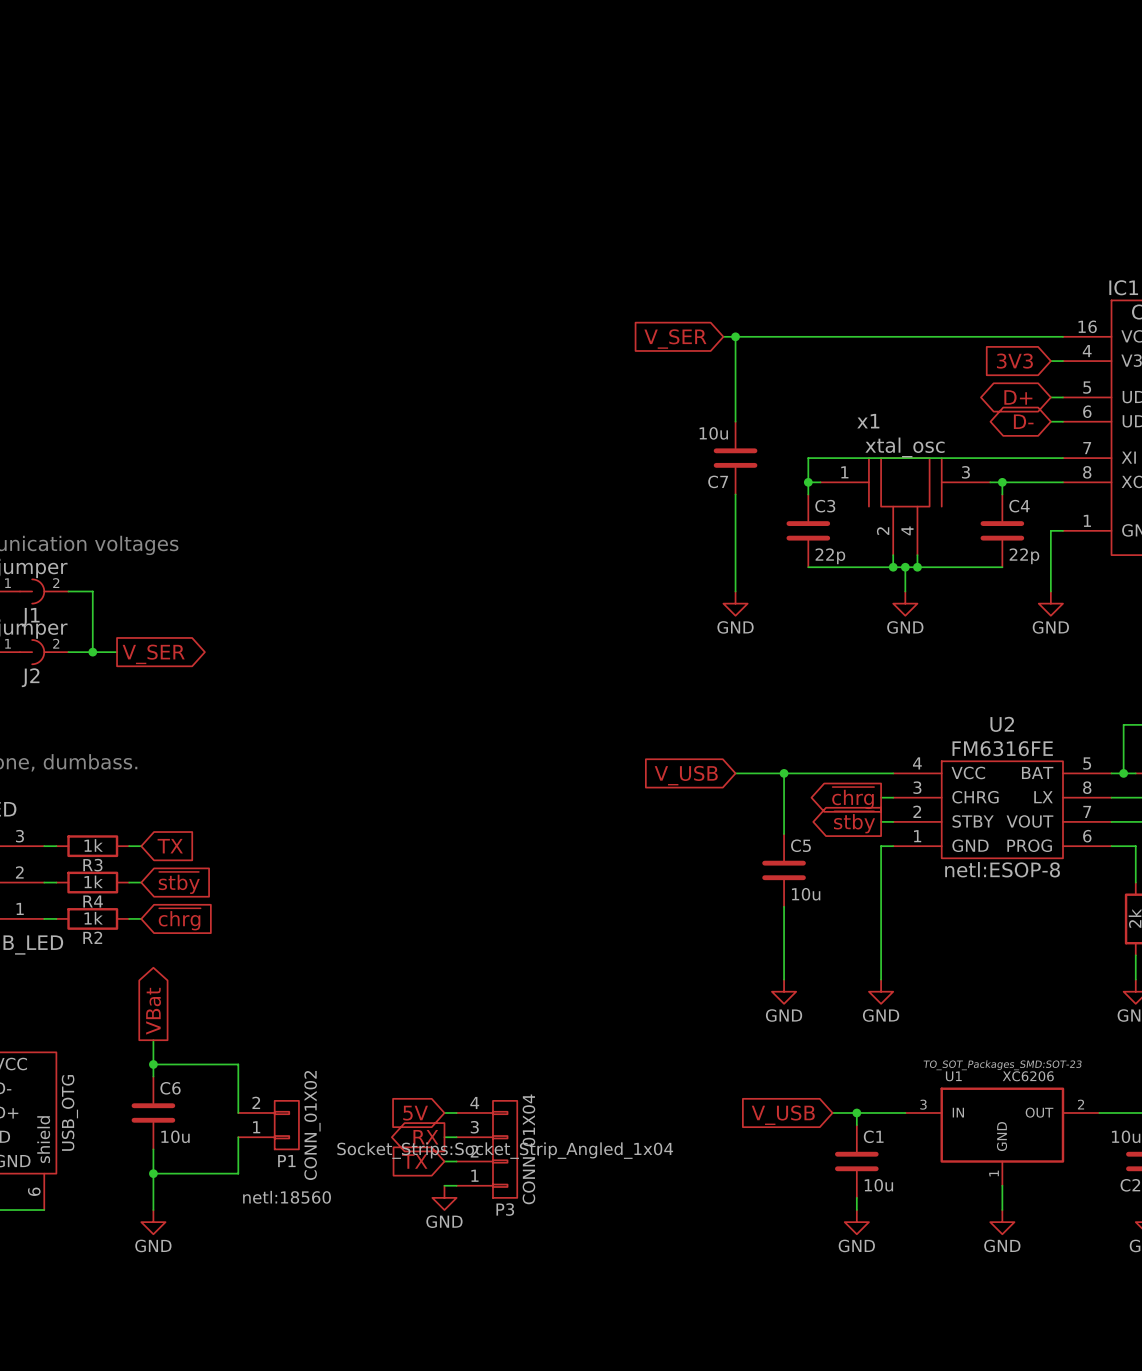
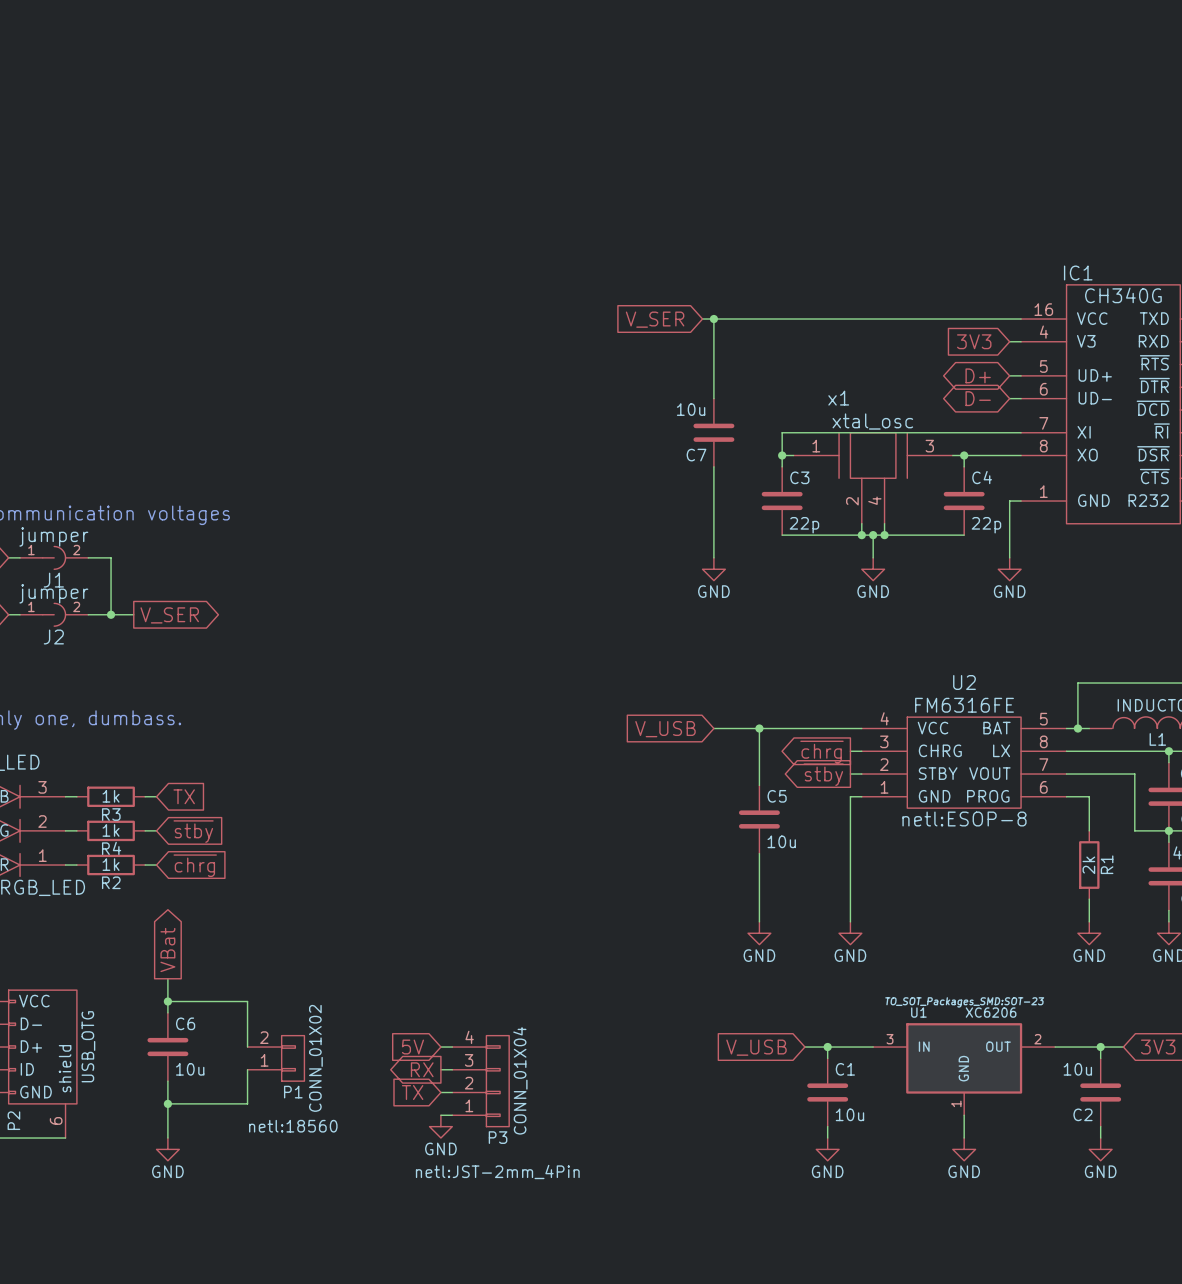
P3 text: Socket_Strips:Socket_Strip_Angled_1x04 (505, 1150) -> netl:JST-2mm_4Pin (497, 1171)

